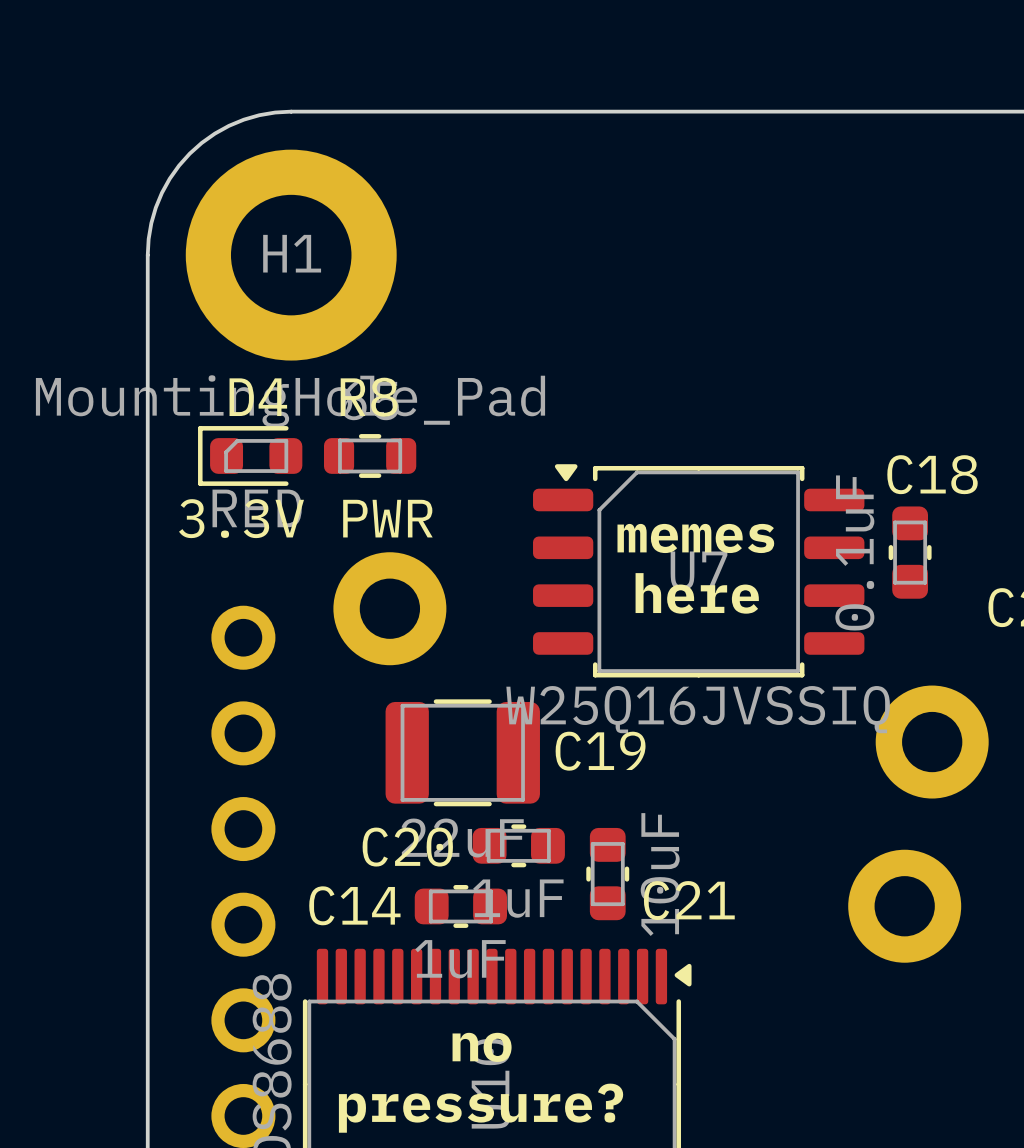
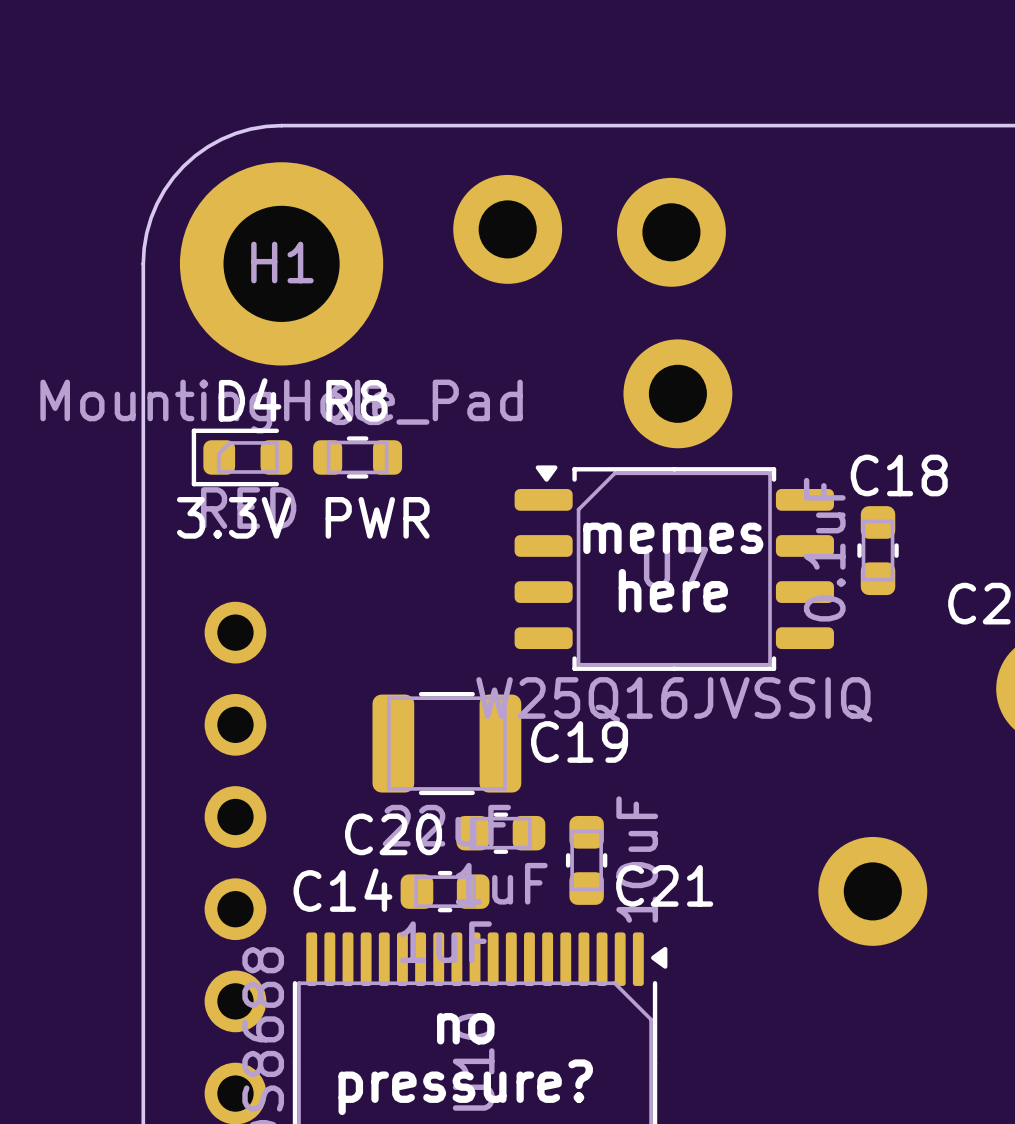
part: none -> (507, 229)
part: none -> (671, 232)
part: none -> (677, 393)
part: (389, 608) -> none
part: (932, 742) -> none

